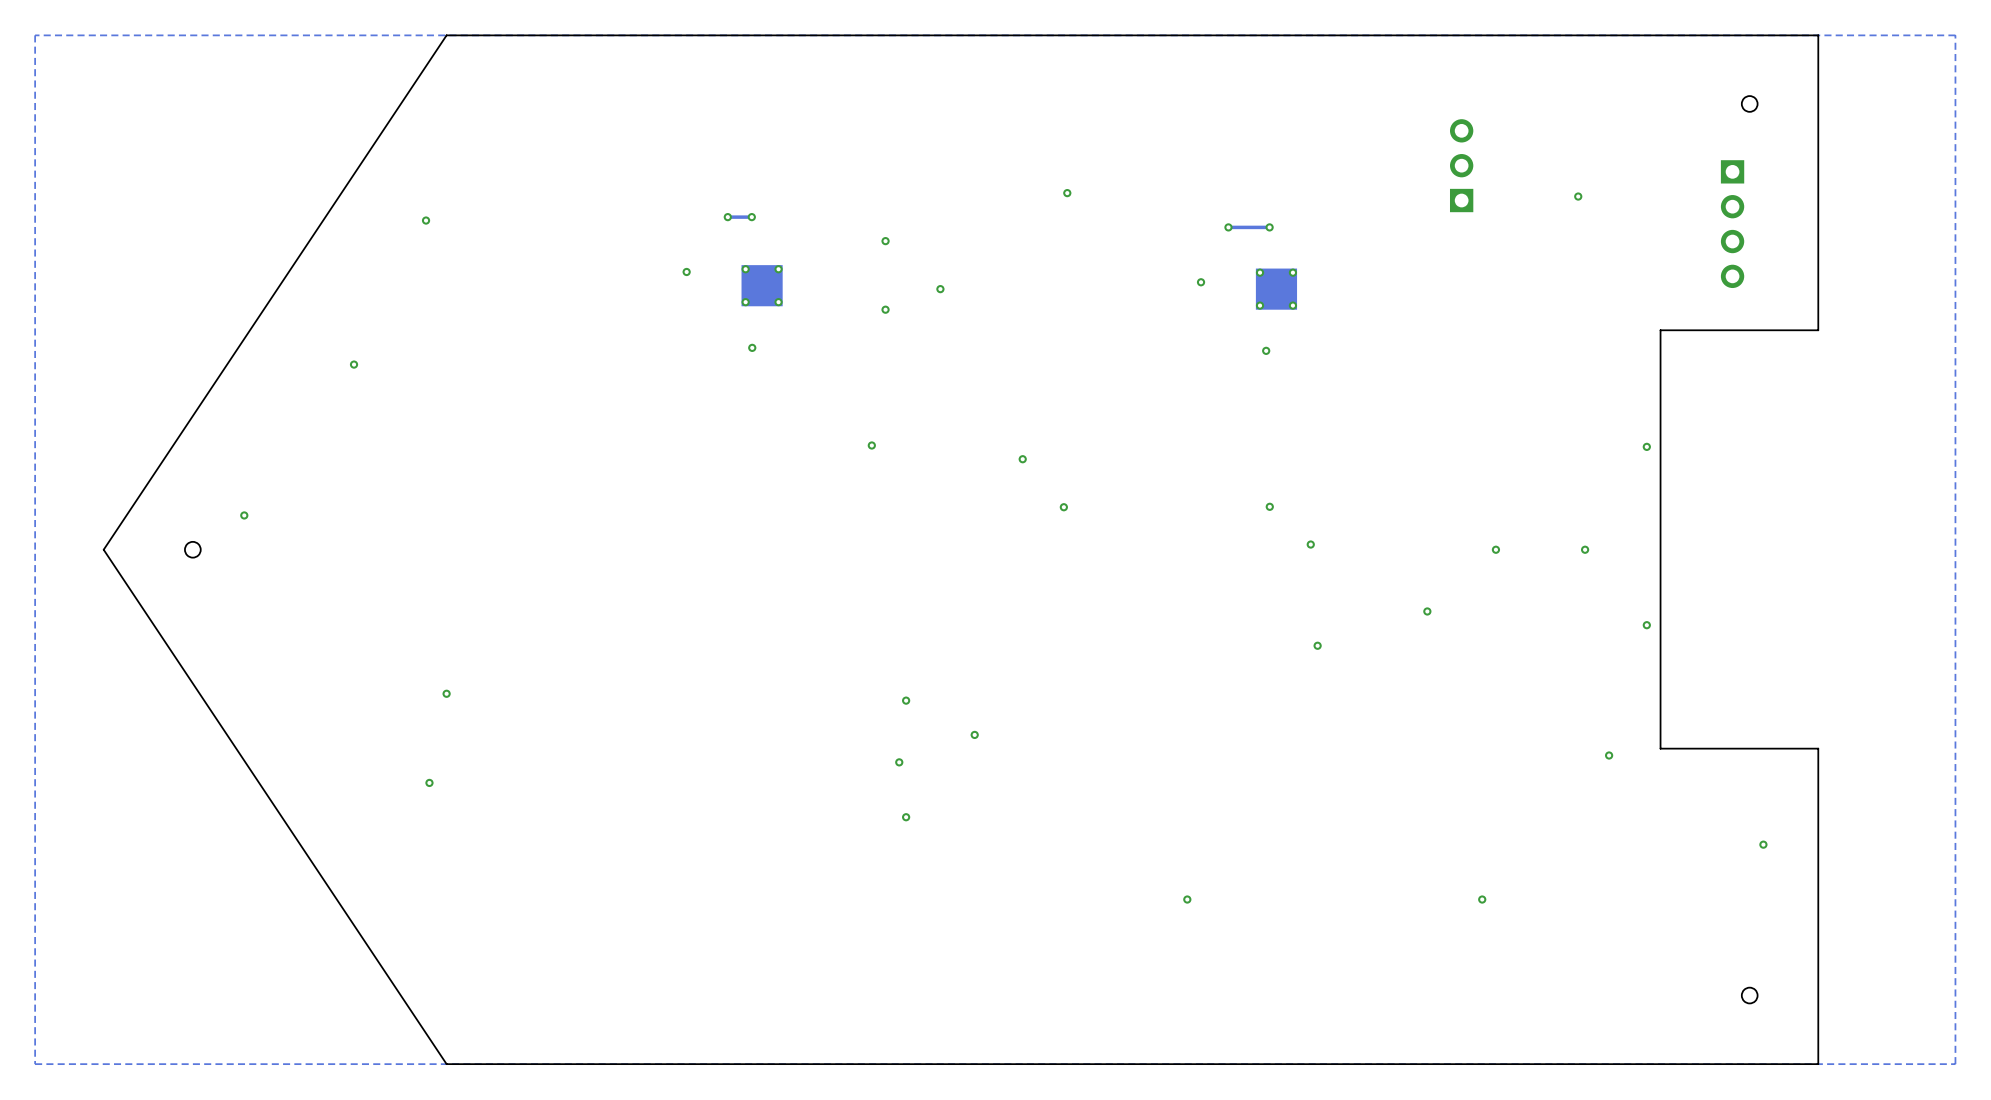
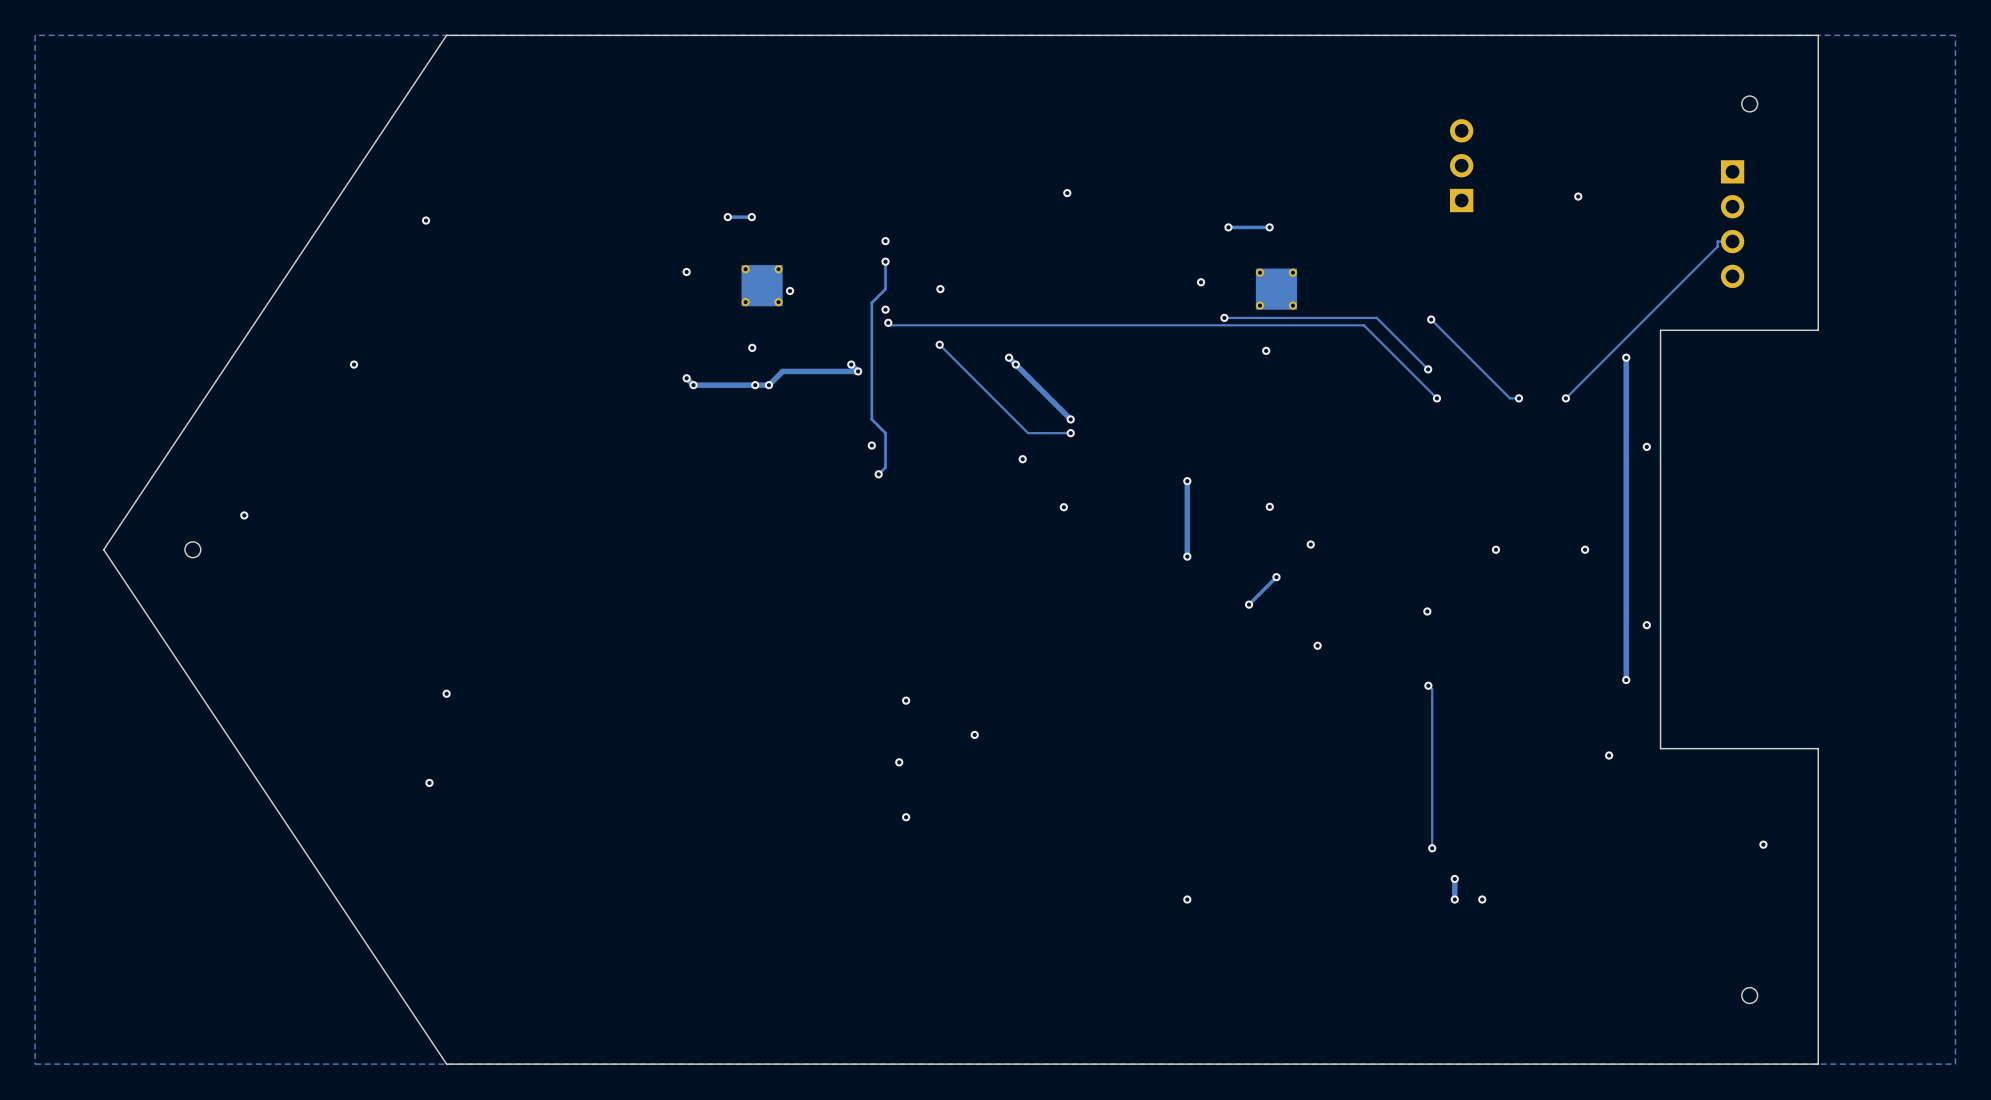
track: none -> (1732, 241) (1717, 241) (1717, 246) (1565, 398)
track: none -> (885, 261) (885, 289) (871, 302) (871, 419) (885, 433) (885, 467) (878, 474)
via: none -> (885, 261)
via: none -> (790, 291)
track: none -> (1224, 317) (1376, 317) (1428, 369)
via: none -> (1224, 317)
track: none -> (1431, 319) (1510, 398) (1518, 398)
via: none -> (1431, 319)
track: none -> (888, 322) (890, 325) (1363, 325) (1436, 398)
via: none -> (888, 322)
track: none -> (939, 344) (1028, 433) (1070, 433)
via: none -> (939, 344)
track: none -> (1008, 357) (1070, 419)
via: none -> (1008, 357)
track: none -> (1626, 357) (1626, 680)
via: none -> (1626, 357)
track: none -> (851, 364) (858, 371) (782, 371) (768, 385) (693, 385) (686, 378)
via: none -> (851, 364)
via: none -> (1015, 364)
via: none -> (1428, 369)
via: none -> (858, 371)
via: none -> (686, 378)
via: none -> (693, 385)
via: none -> (755, 385)
via: none -> (768, 385)
via: none -> (1436, 398)
via: none -> (1518, 398)
via: none -> (1565, 398)
via: none -> (1070, 419)
via: none -> (1070, 433)
via: none -> (878, 474)
track: none -> (1187, 481) (1187, 556)
via: none -> (1187, 481)
via: none -> (1187, 556)
track: none -> (1276, 577) (1249, 604)
via: none -> (1276, 577)
via: none -> (1249, 604)
via: none -> (1626, 680)
track: none -> (1428, 685) (1432, 689) (1432, 848)
via: none -> (1428, 685)
via: none -> (1432, 848)
track: none -> (1454, 878) (1454, 899)
via: none -> (1454, 878)
via: none -> (1454, 899)

